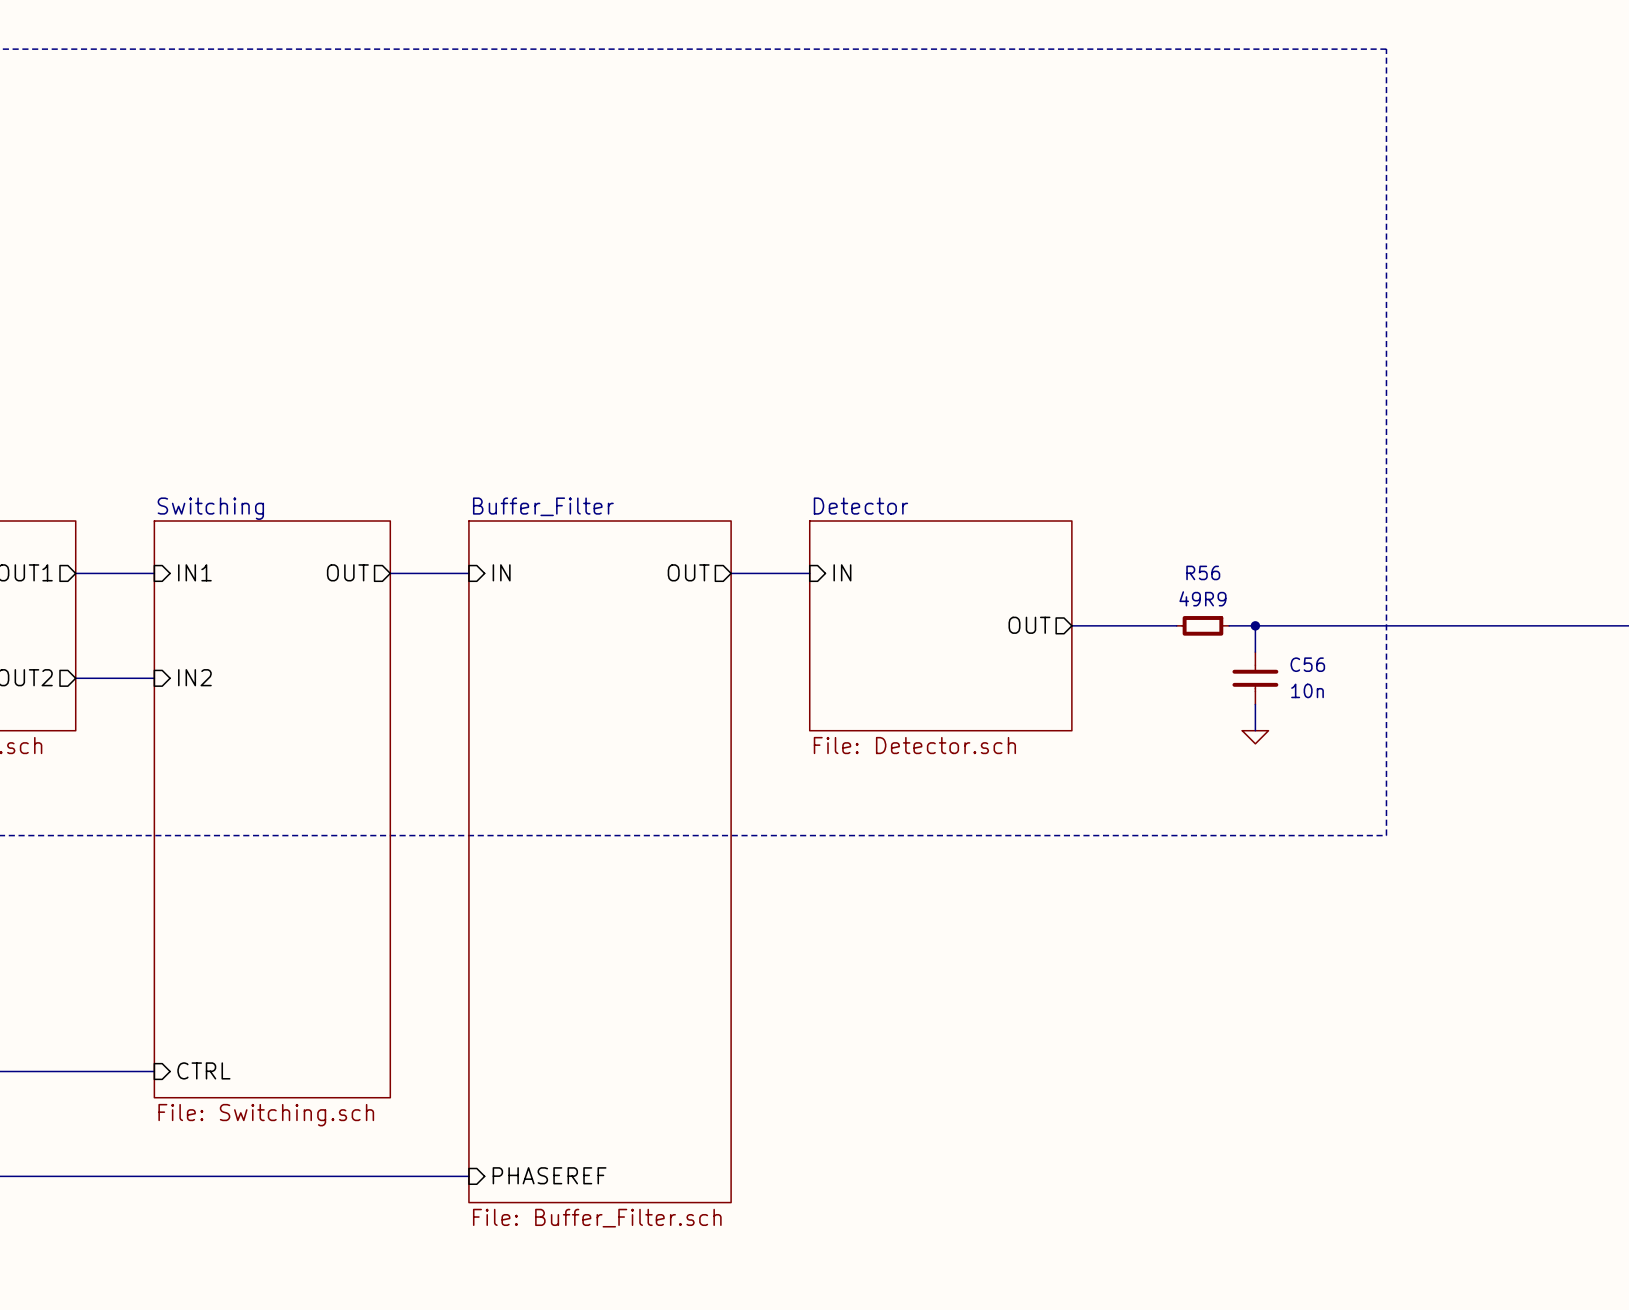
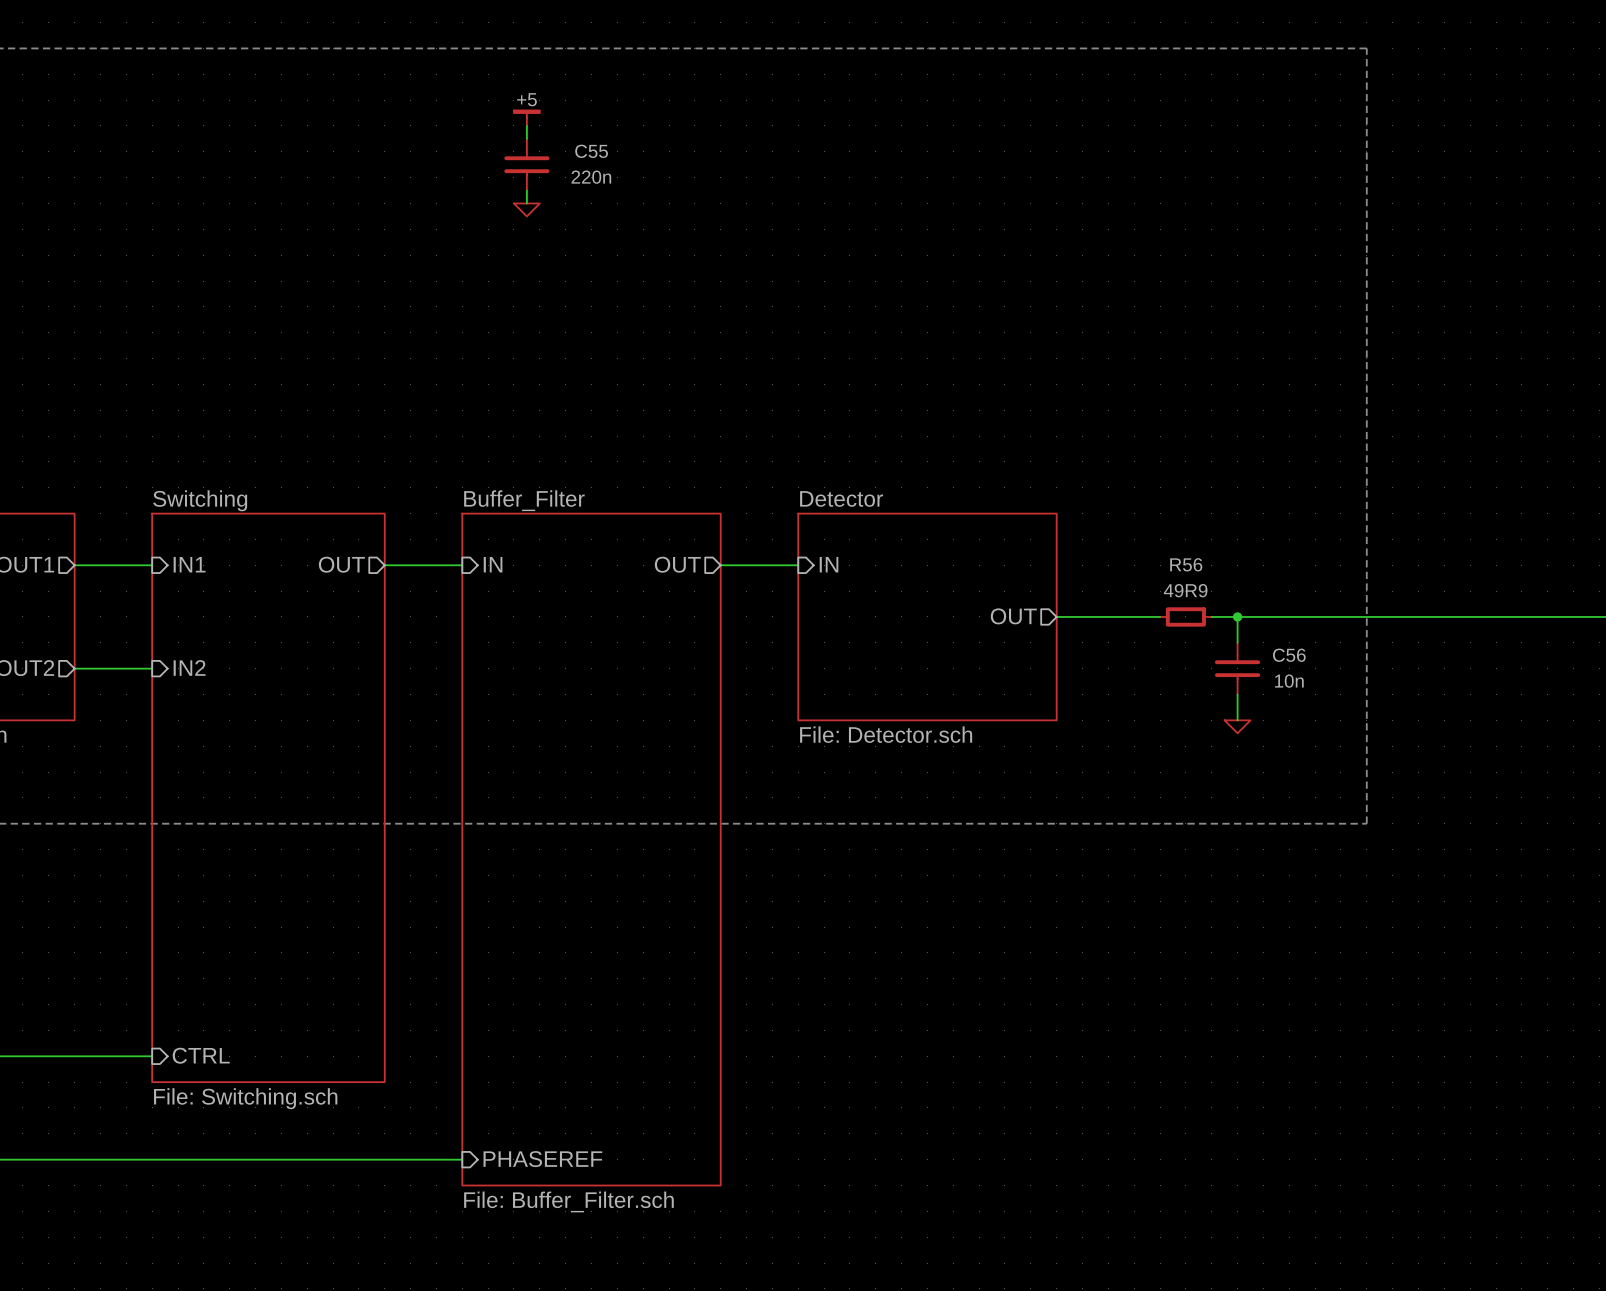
power symbol: none -> +5 (526, 118)
wire: none -> (526, 125) (526, 138)
C55: none -> 220n (526, 164)
wire: none -> (526, 190) (526, 203)
power symbol: none -> (526, 209)

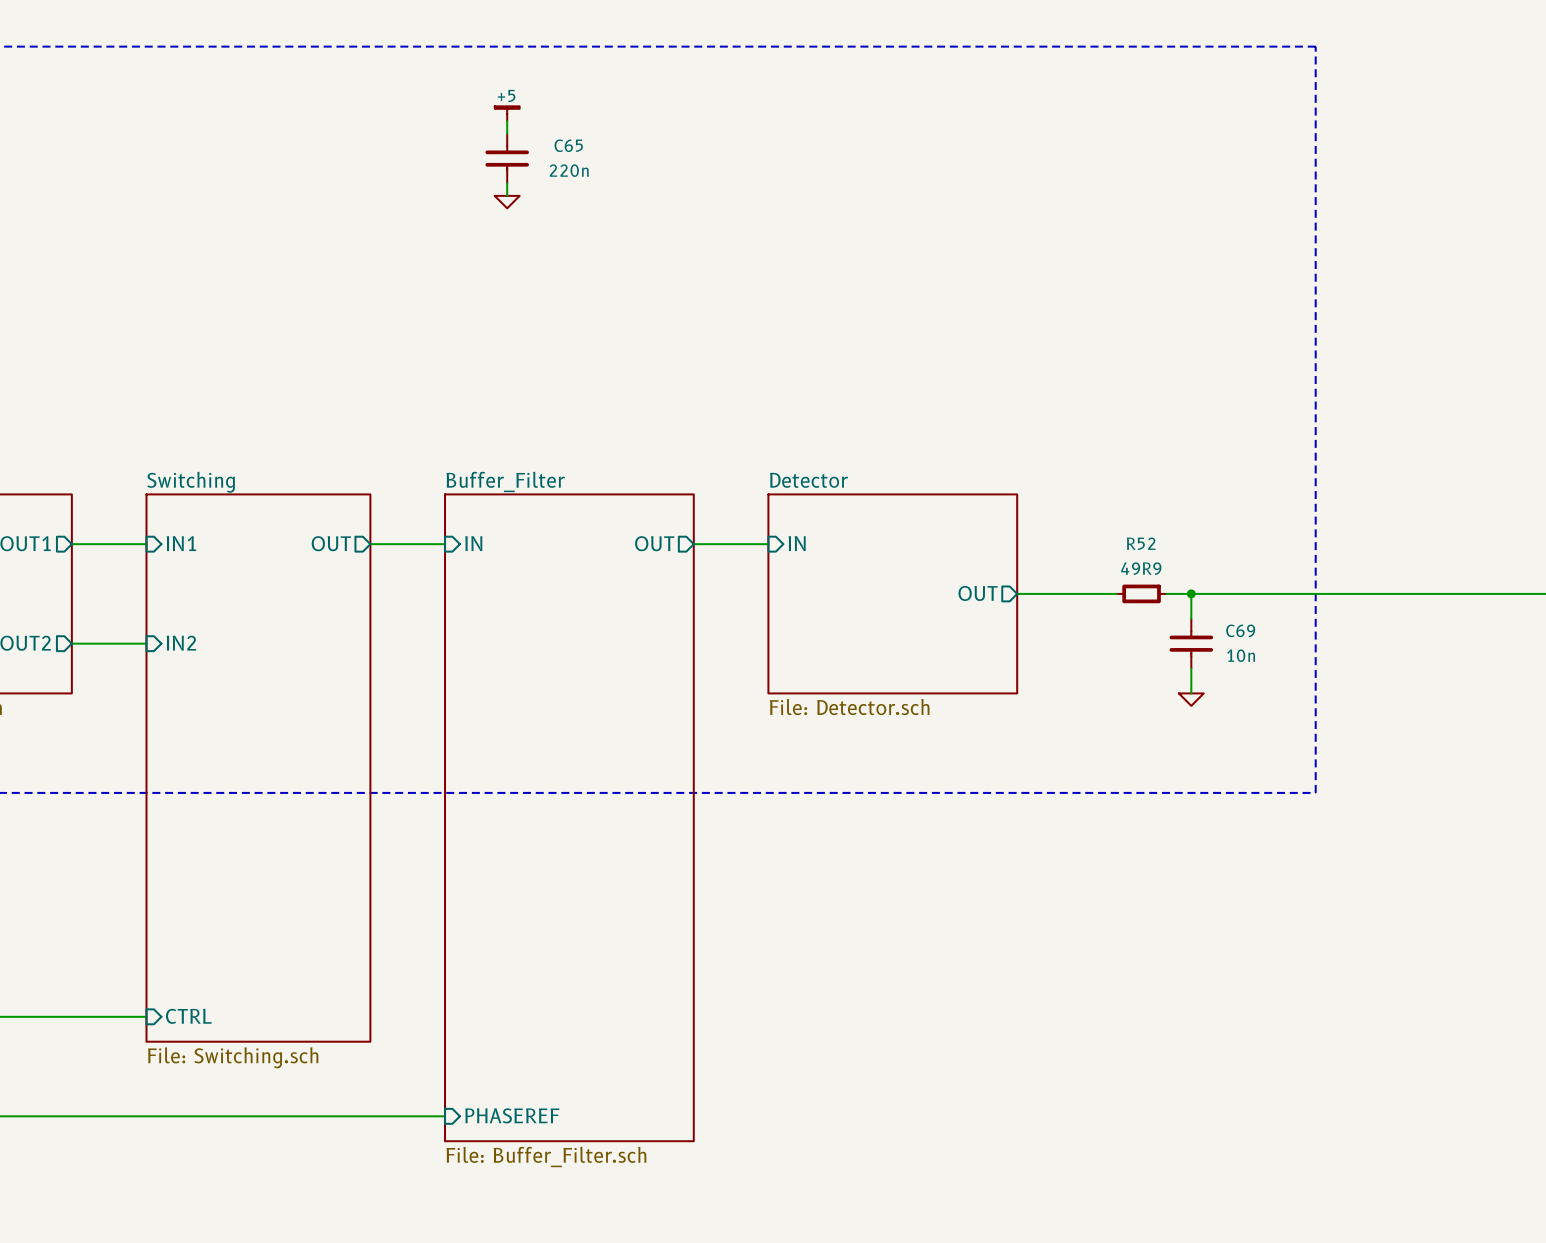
C55 name: C55 (591, 151) -> C65 (568, 145)
R56 name: R56 (1186, 564) -> R52 (1141, 543)
C56 name: C56 (1289, 655) -> C69 (1240, 630)

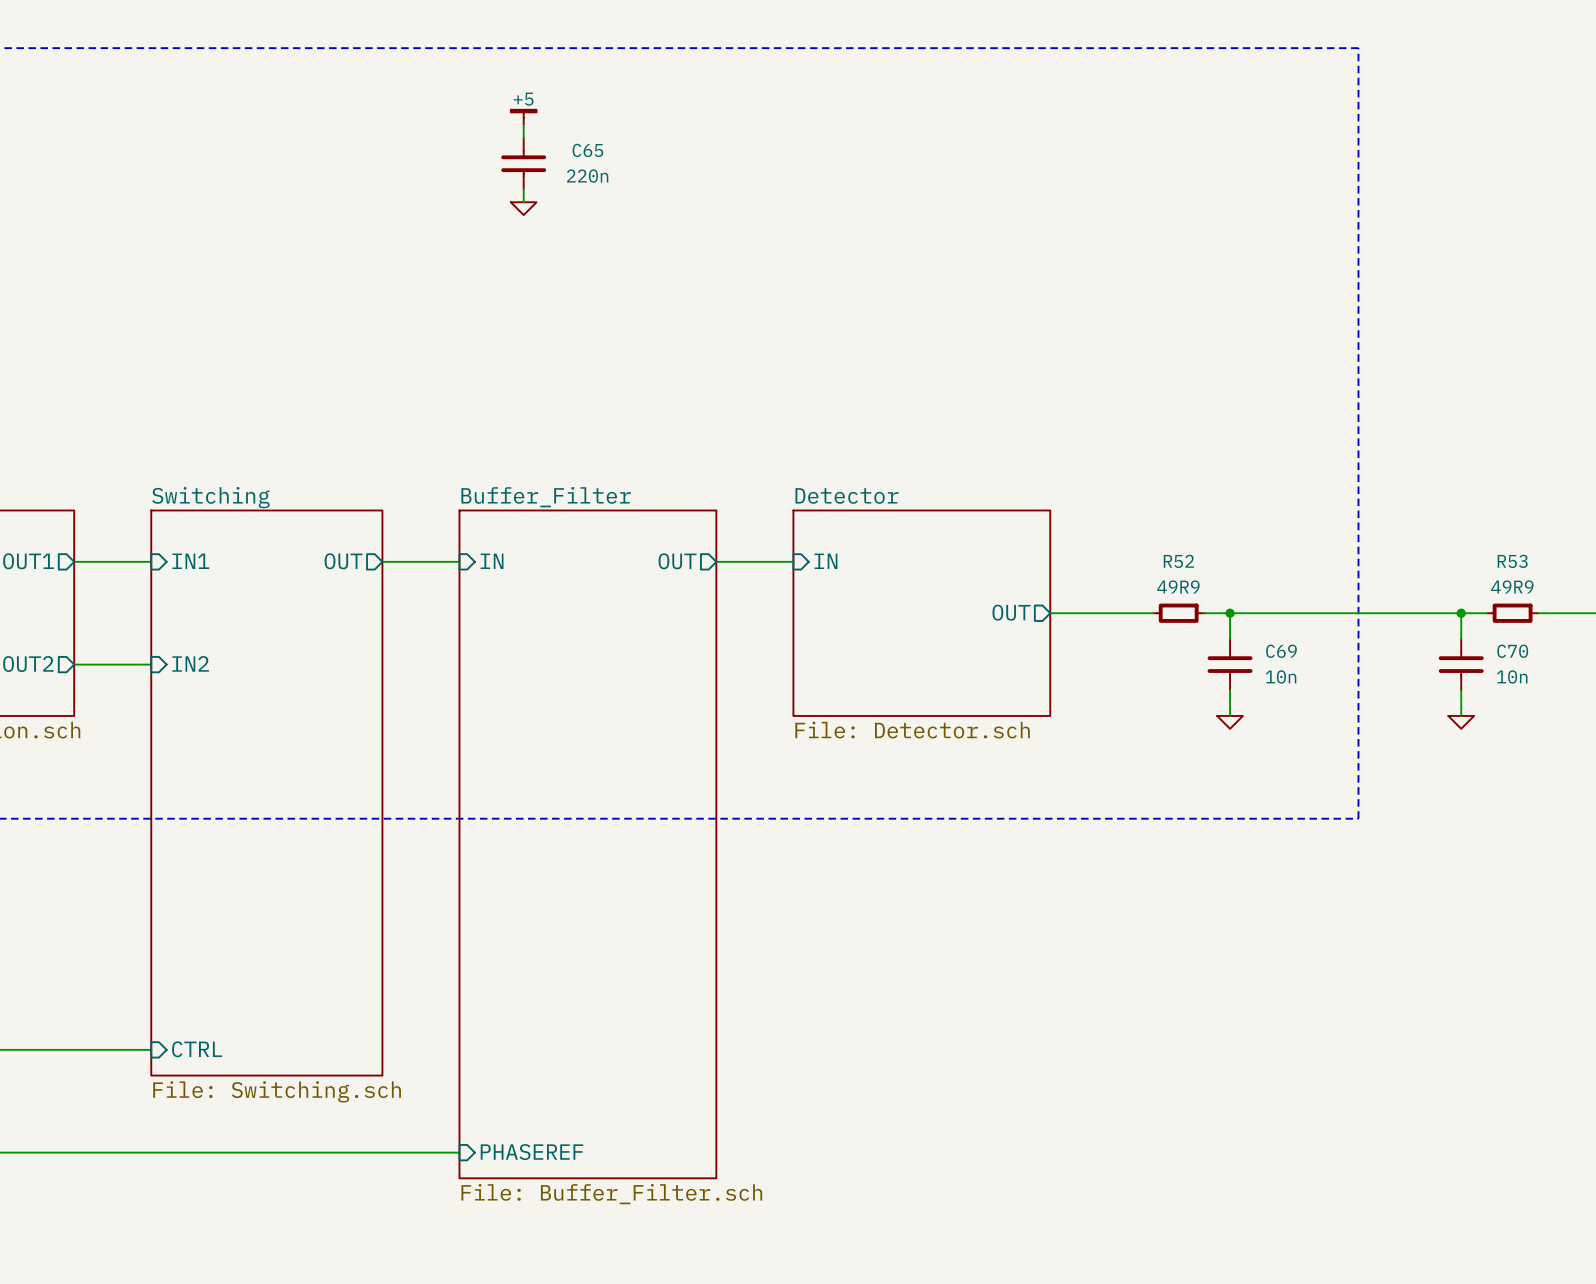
wire: none -> (1461, 613) (1461, 638)
junction: none -> (1461, 613)
wire: (1440, 593) (1489, 593) -> none
R53: none -> 49R9 (1512, 613)
C70: none -> 10n (1461, 664)
wire: none -> (1461, 690) (1461, 715)
power symbol: none -> (1461, 722)

